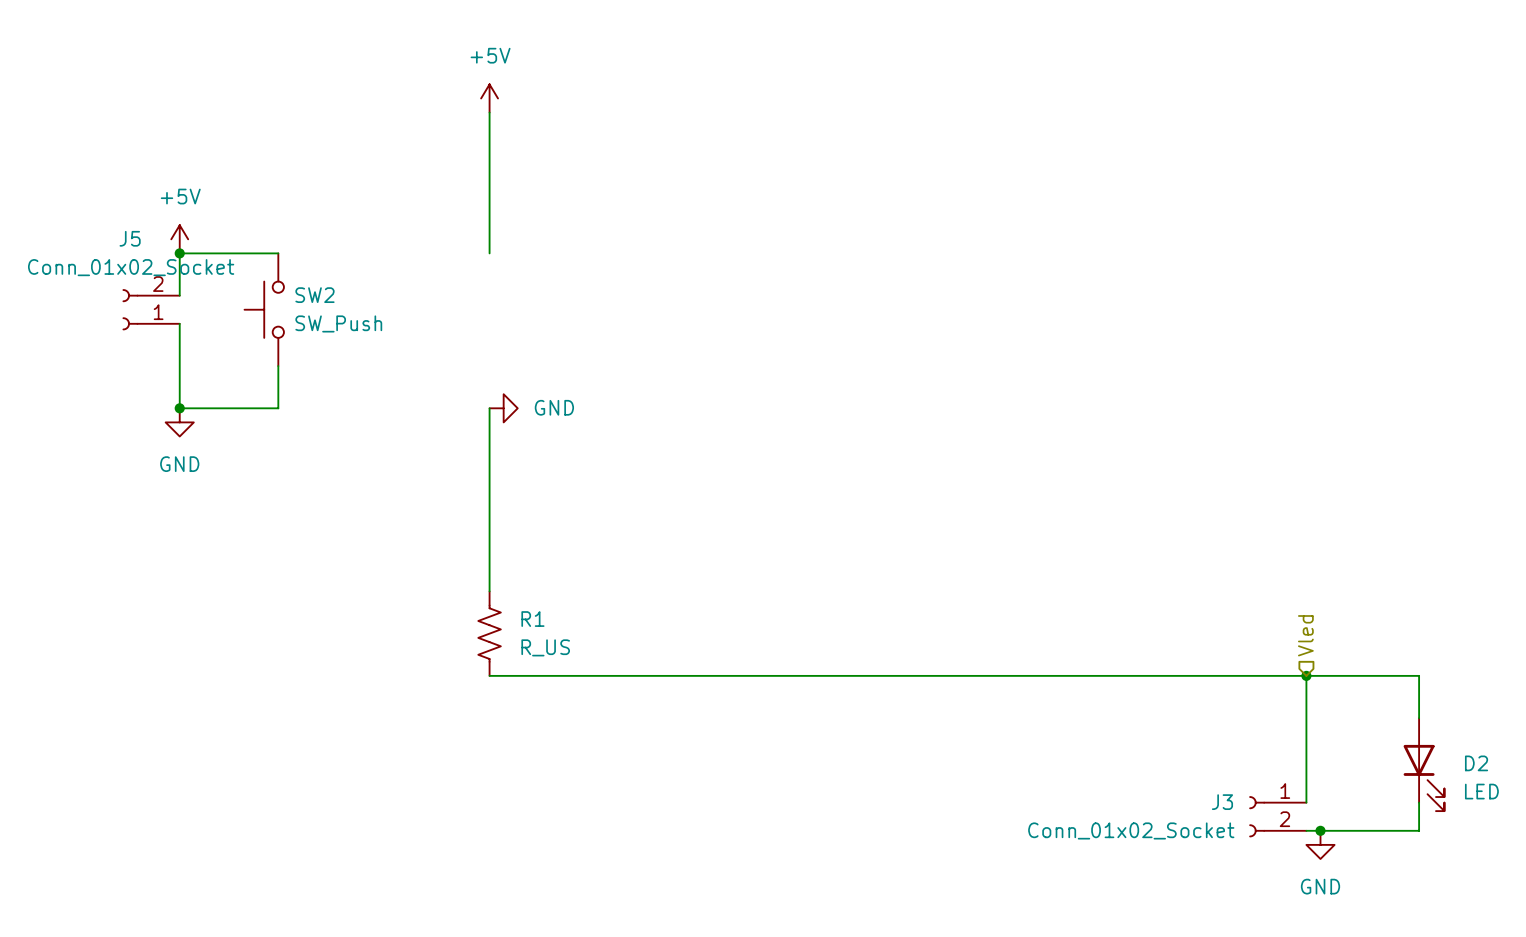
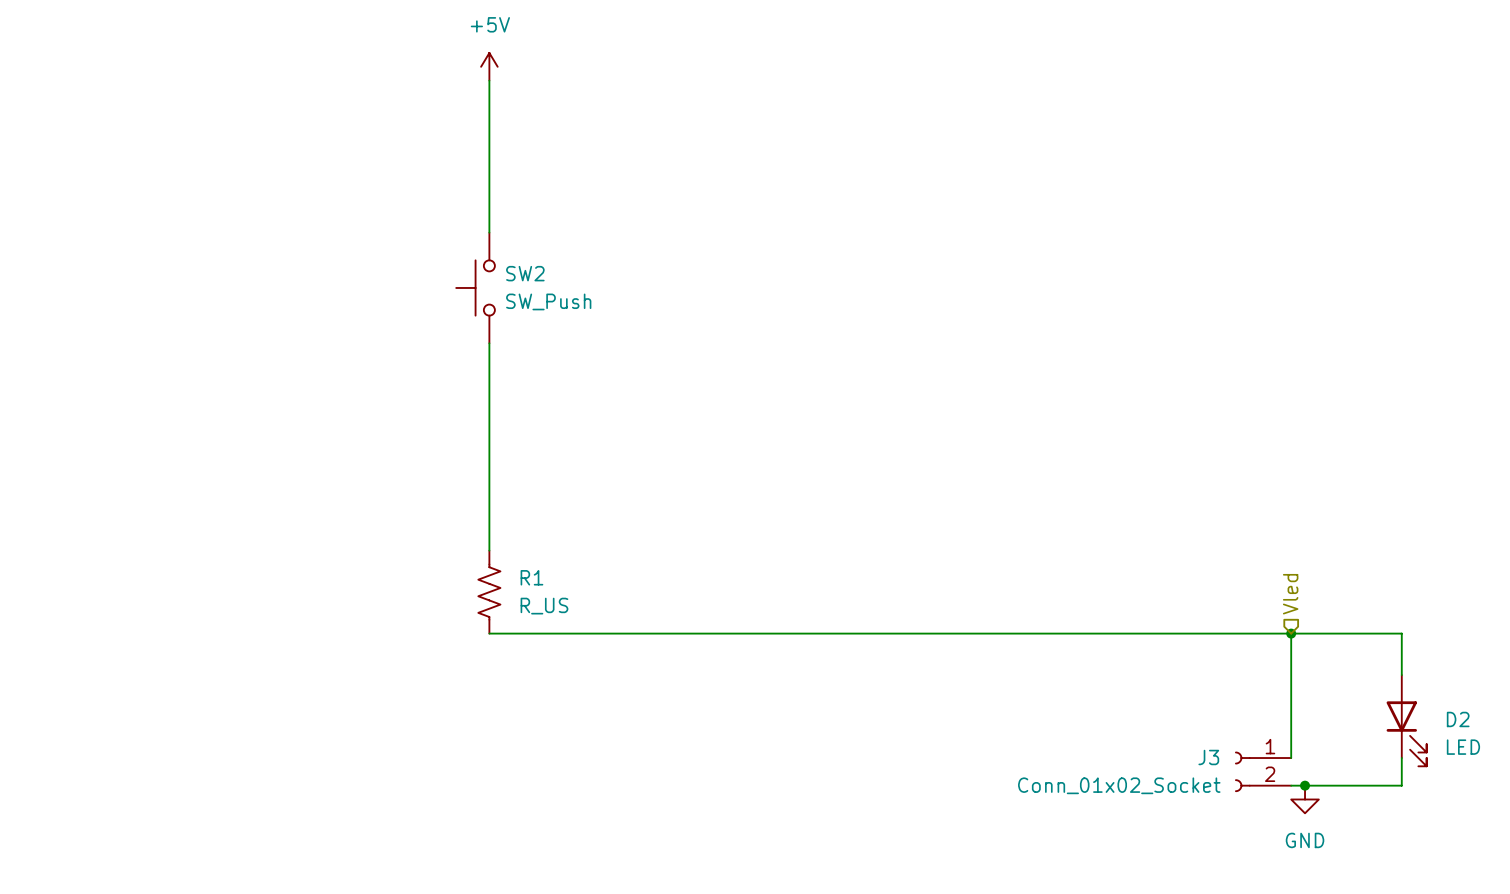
power symbol: +5V (179, 239) -> none
junction: (179, 253) -> none
wire: (278, 253) (179, 253) (179, 295) -> none
wire: none -> (489, 218) (489, 232)
J5: Conn_01x02_Socket (151, 309) -> none
SW2 position: (264, 309) -> (475, 287)
wire: (179, 323) (179, 408) (278, 408) (278, 366) -> none
wire: none -> (489, 343) (489, 370)
junction: (179, 408) -> none
power symbol: GND (503, 408) -> none
power symbol: GND (179, 422) -> none

